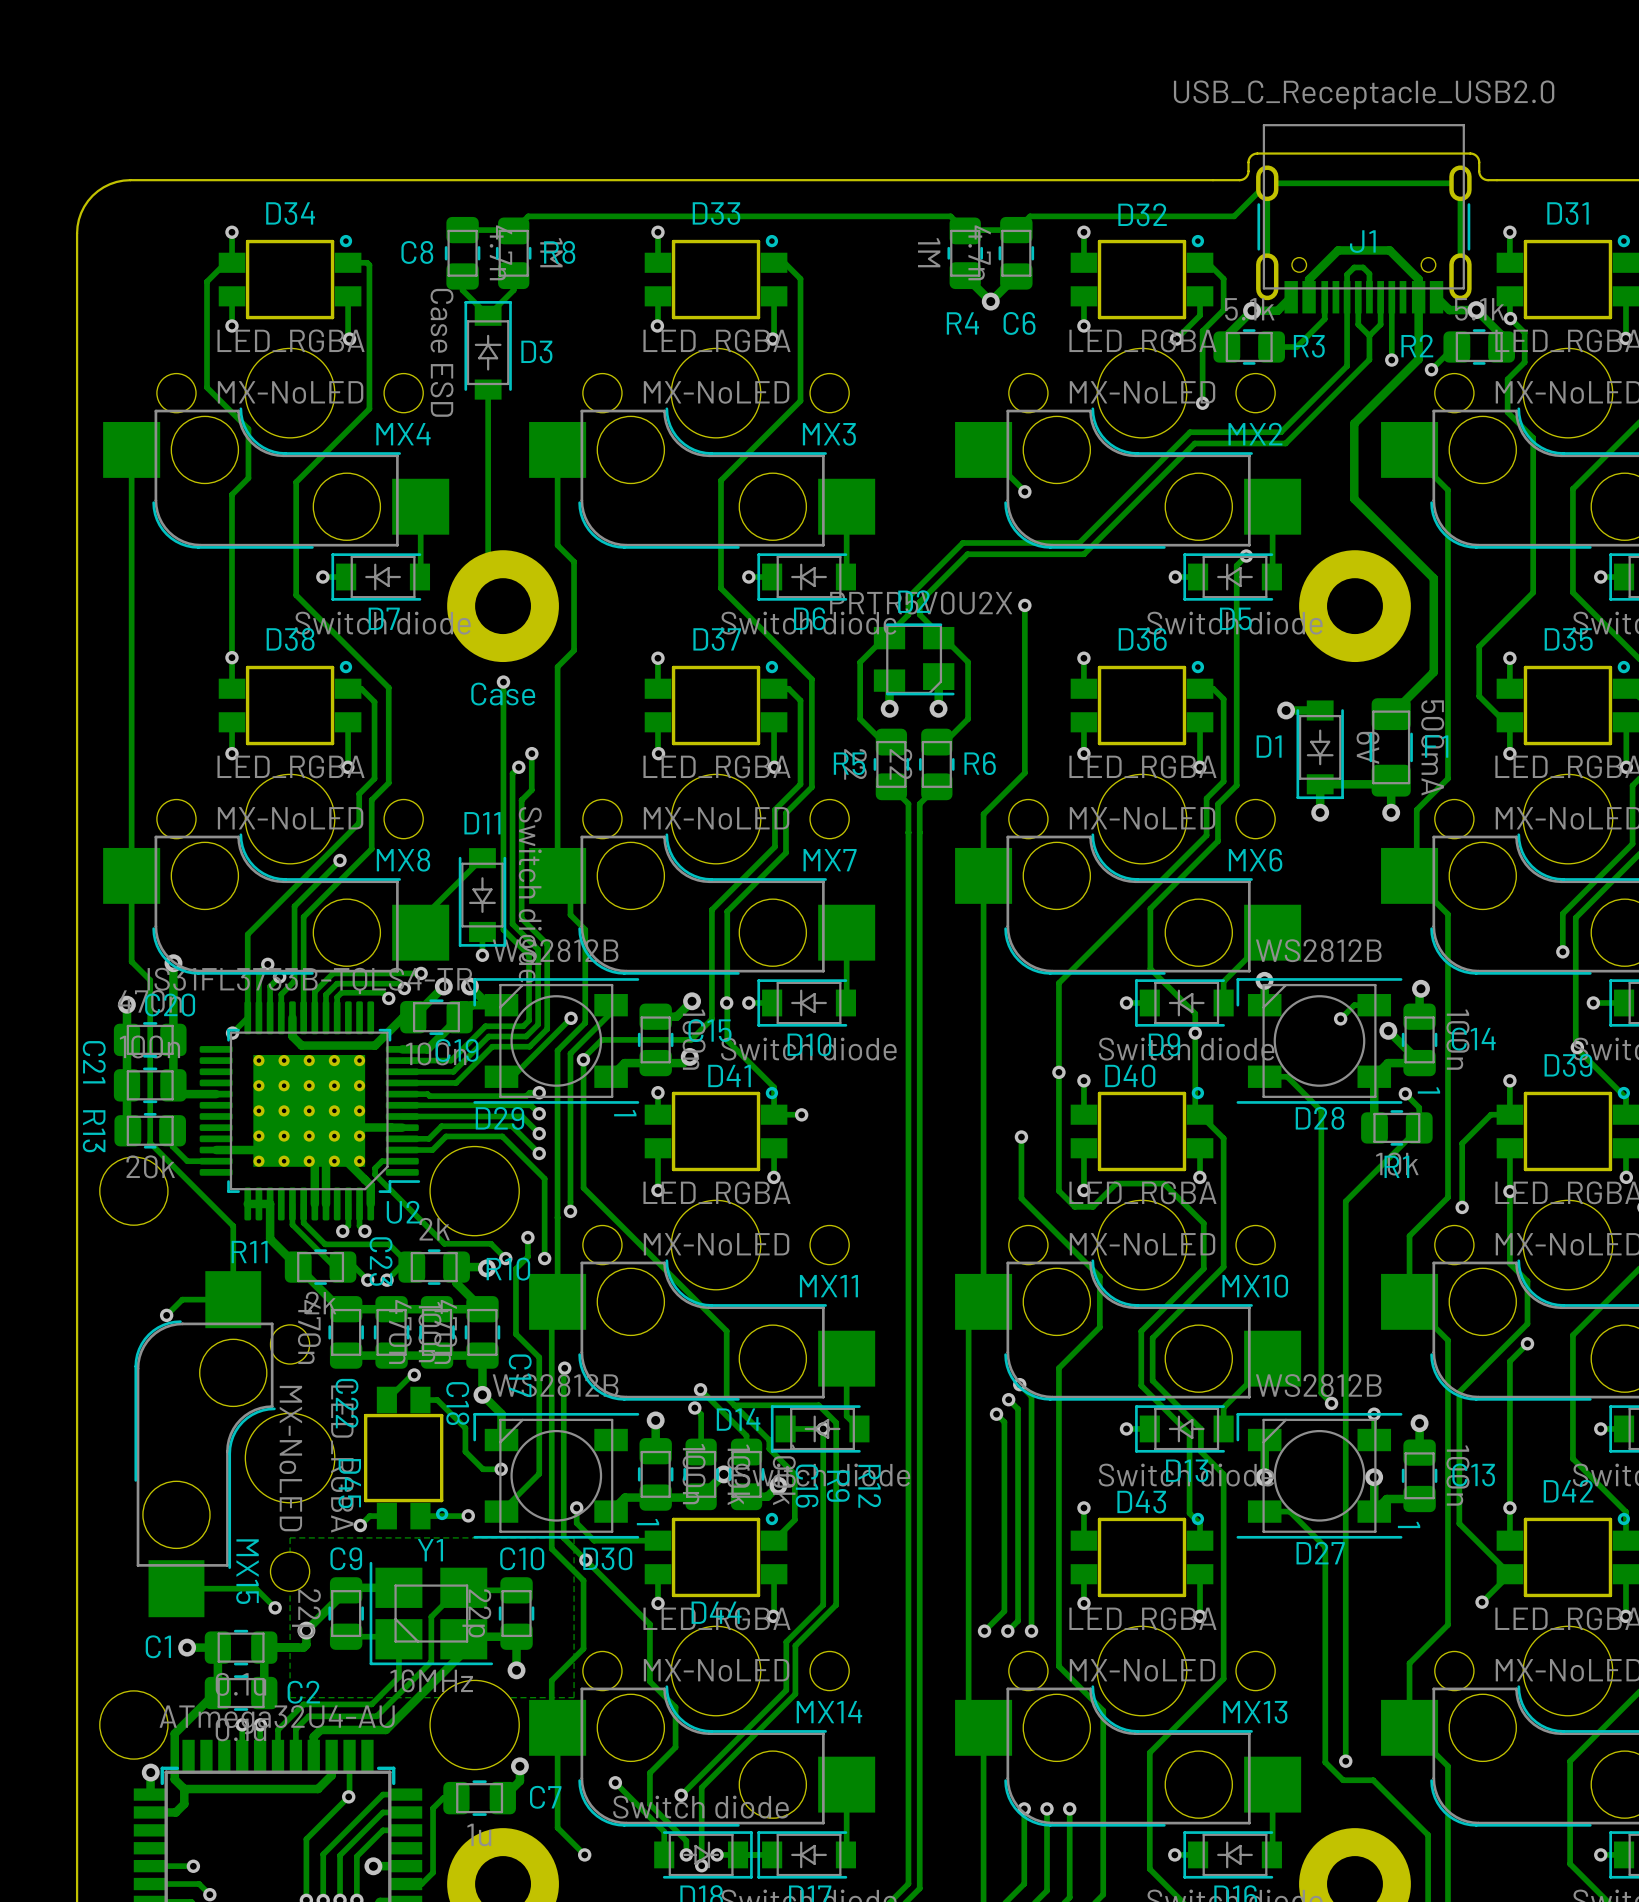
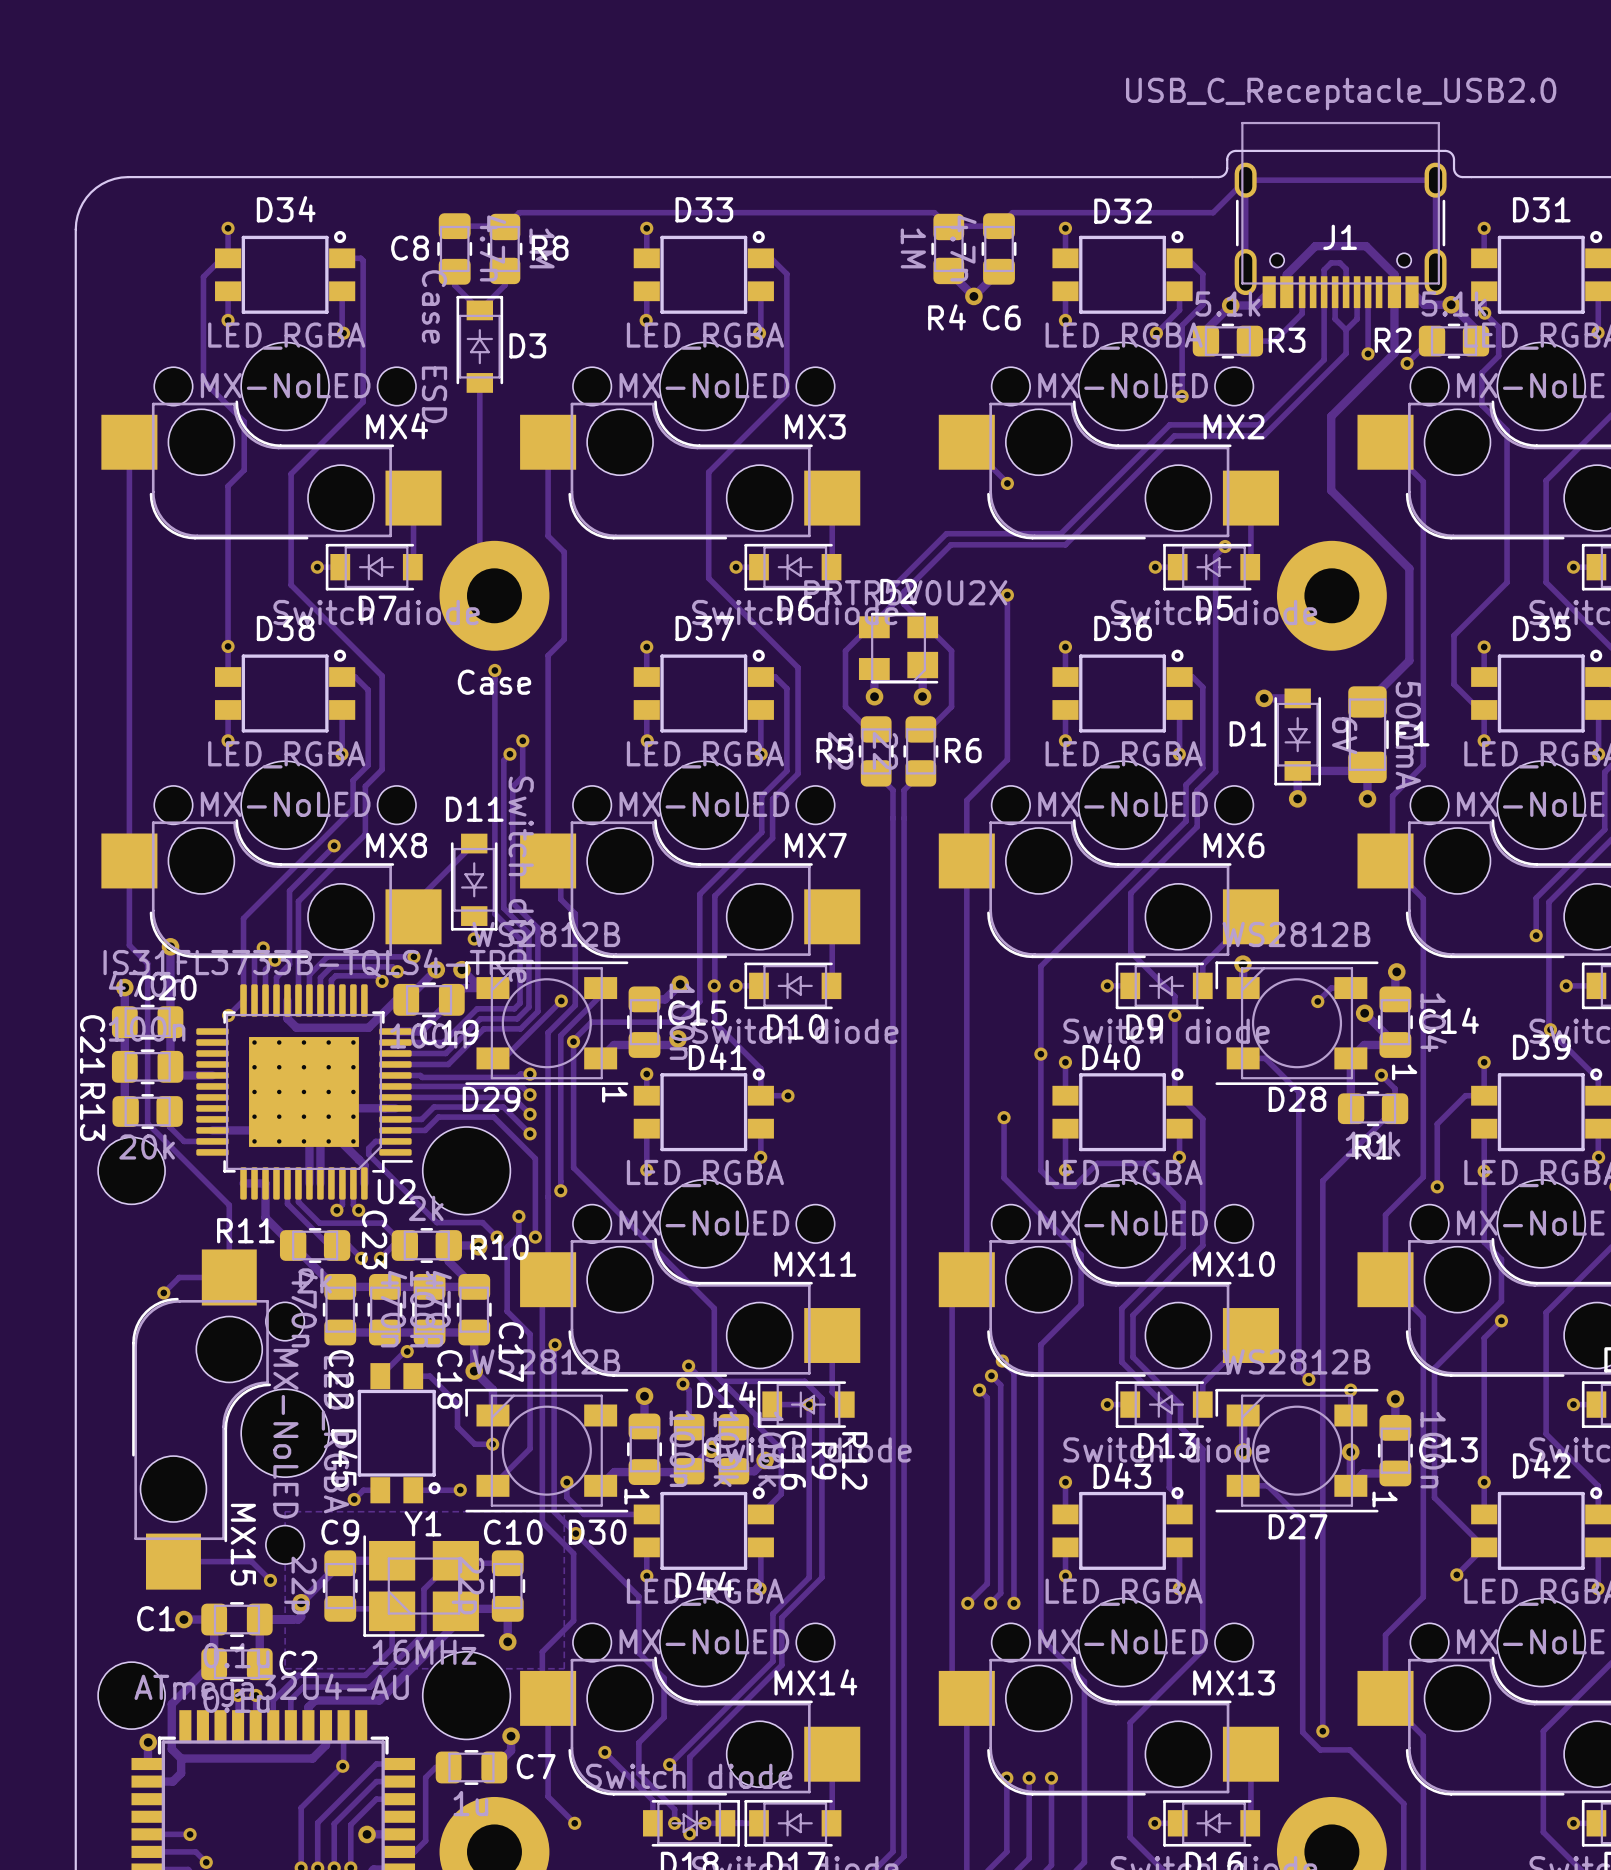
C14 value: 100n (1457, 1039) -> 104 (1433, 1022)

